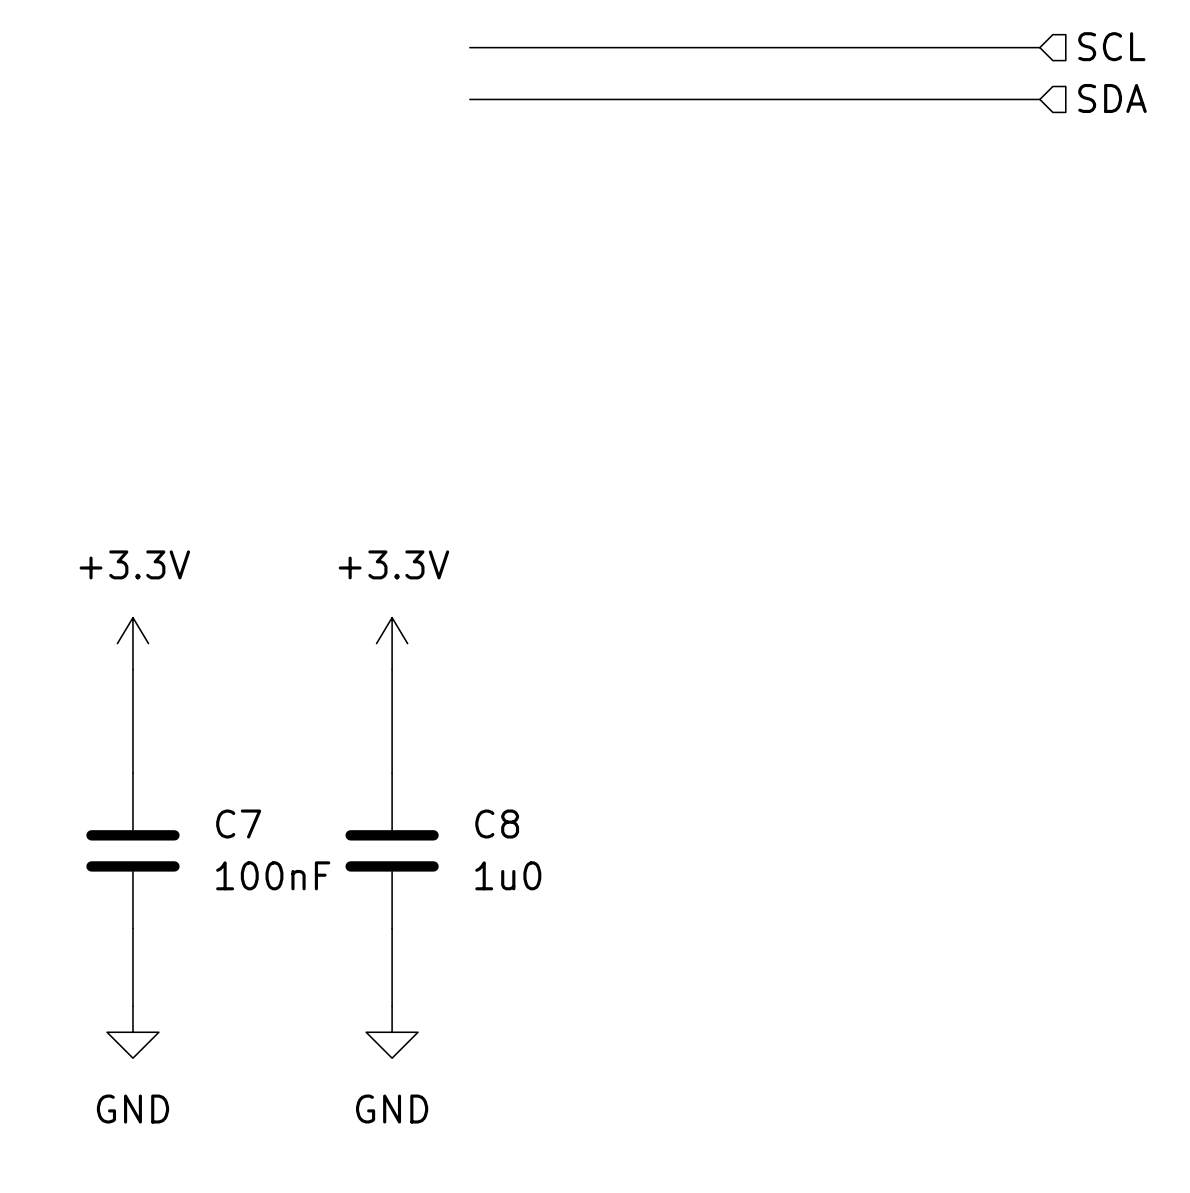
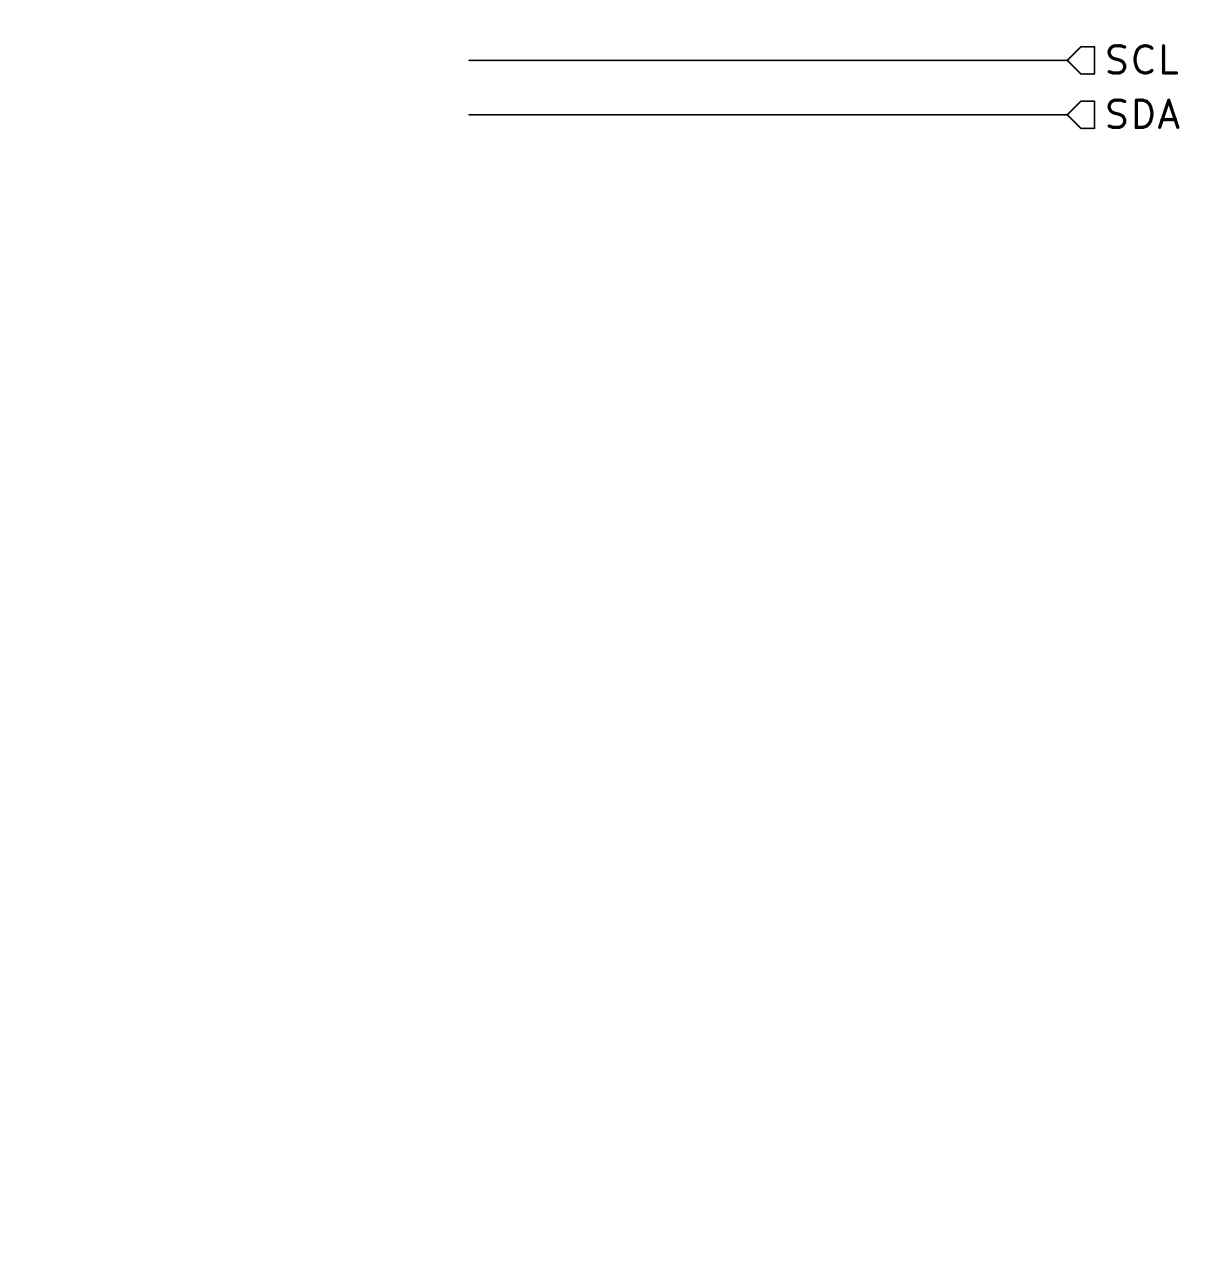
power symbol: +3.3V (132, 643) -> none
power symbol: +3.3V (392, 643) -> none
wire: (132, 669) (132, 773) -> none
wire: (392, 669) (392, 773) -> none
C7: 100nF (132, 850) -> none
C8: 1u0 (392, 850) -> none
wire: (132, 928) (132, 1006) -> none
wire: (392, 928) (392, 1006) -> none
power symbol: GND (132, 1032) -> none
power symbol: GND (392, 1032) -> none

